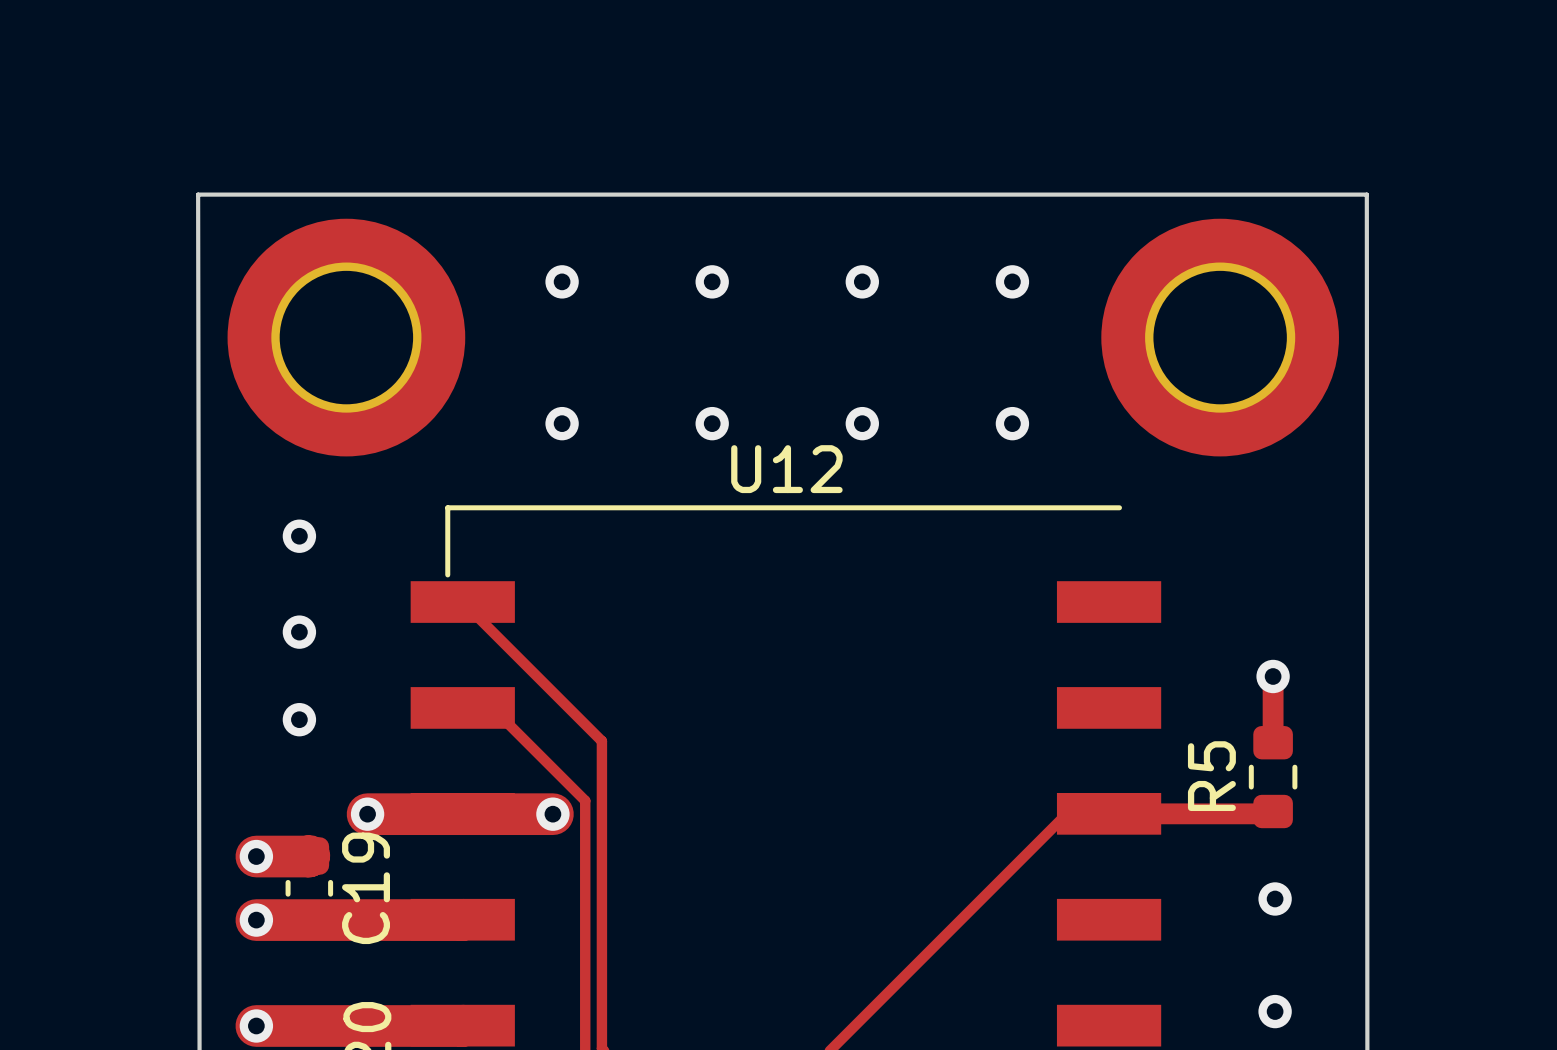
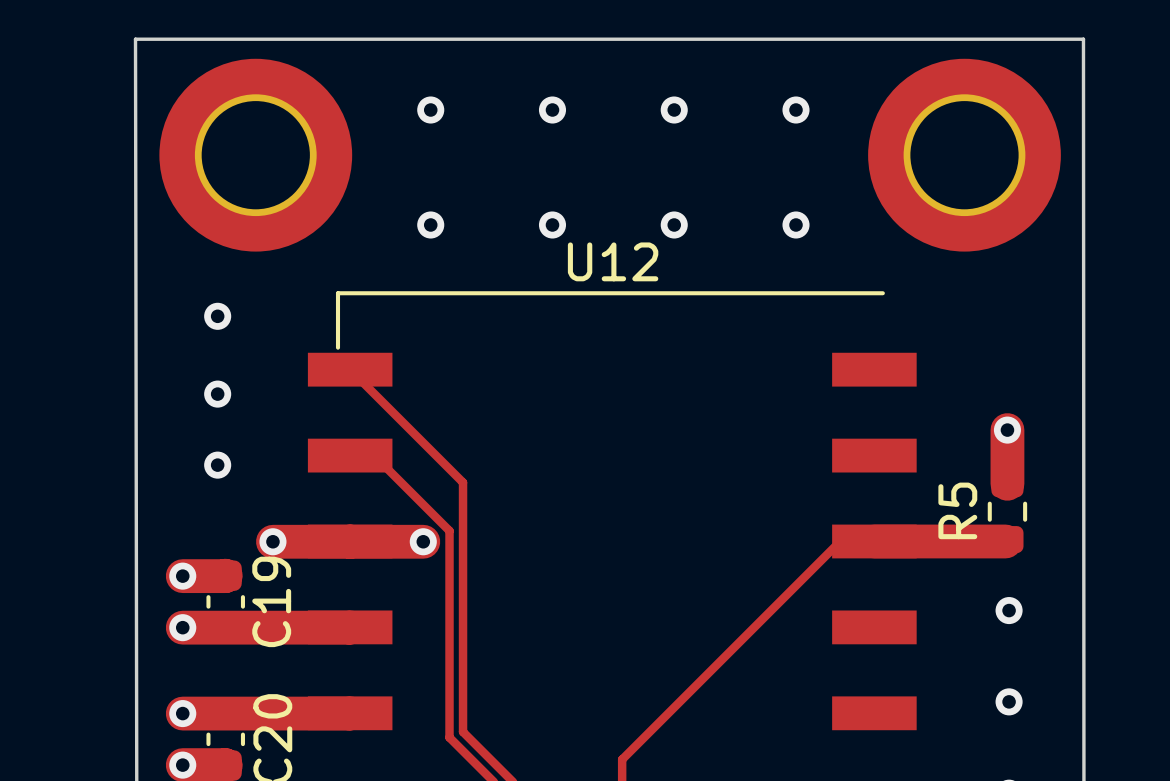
track width: thin (1273, 676) (1273, 742) -> thick (1007, 430) (1007, 483)
track width: thin (1109, 813) (1270, 813) -> thick (874, 541) (1005, 541)

